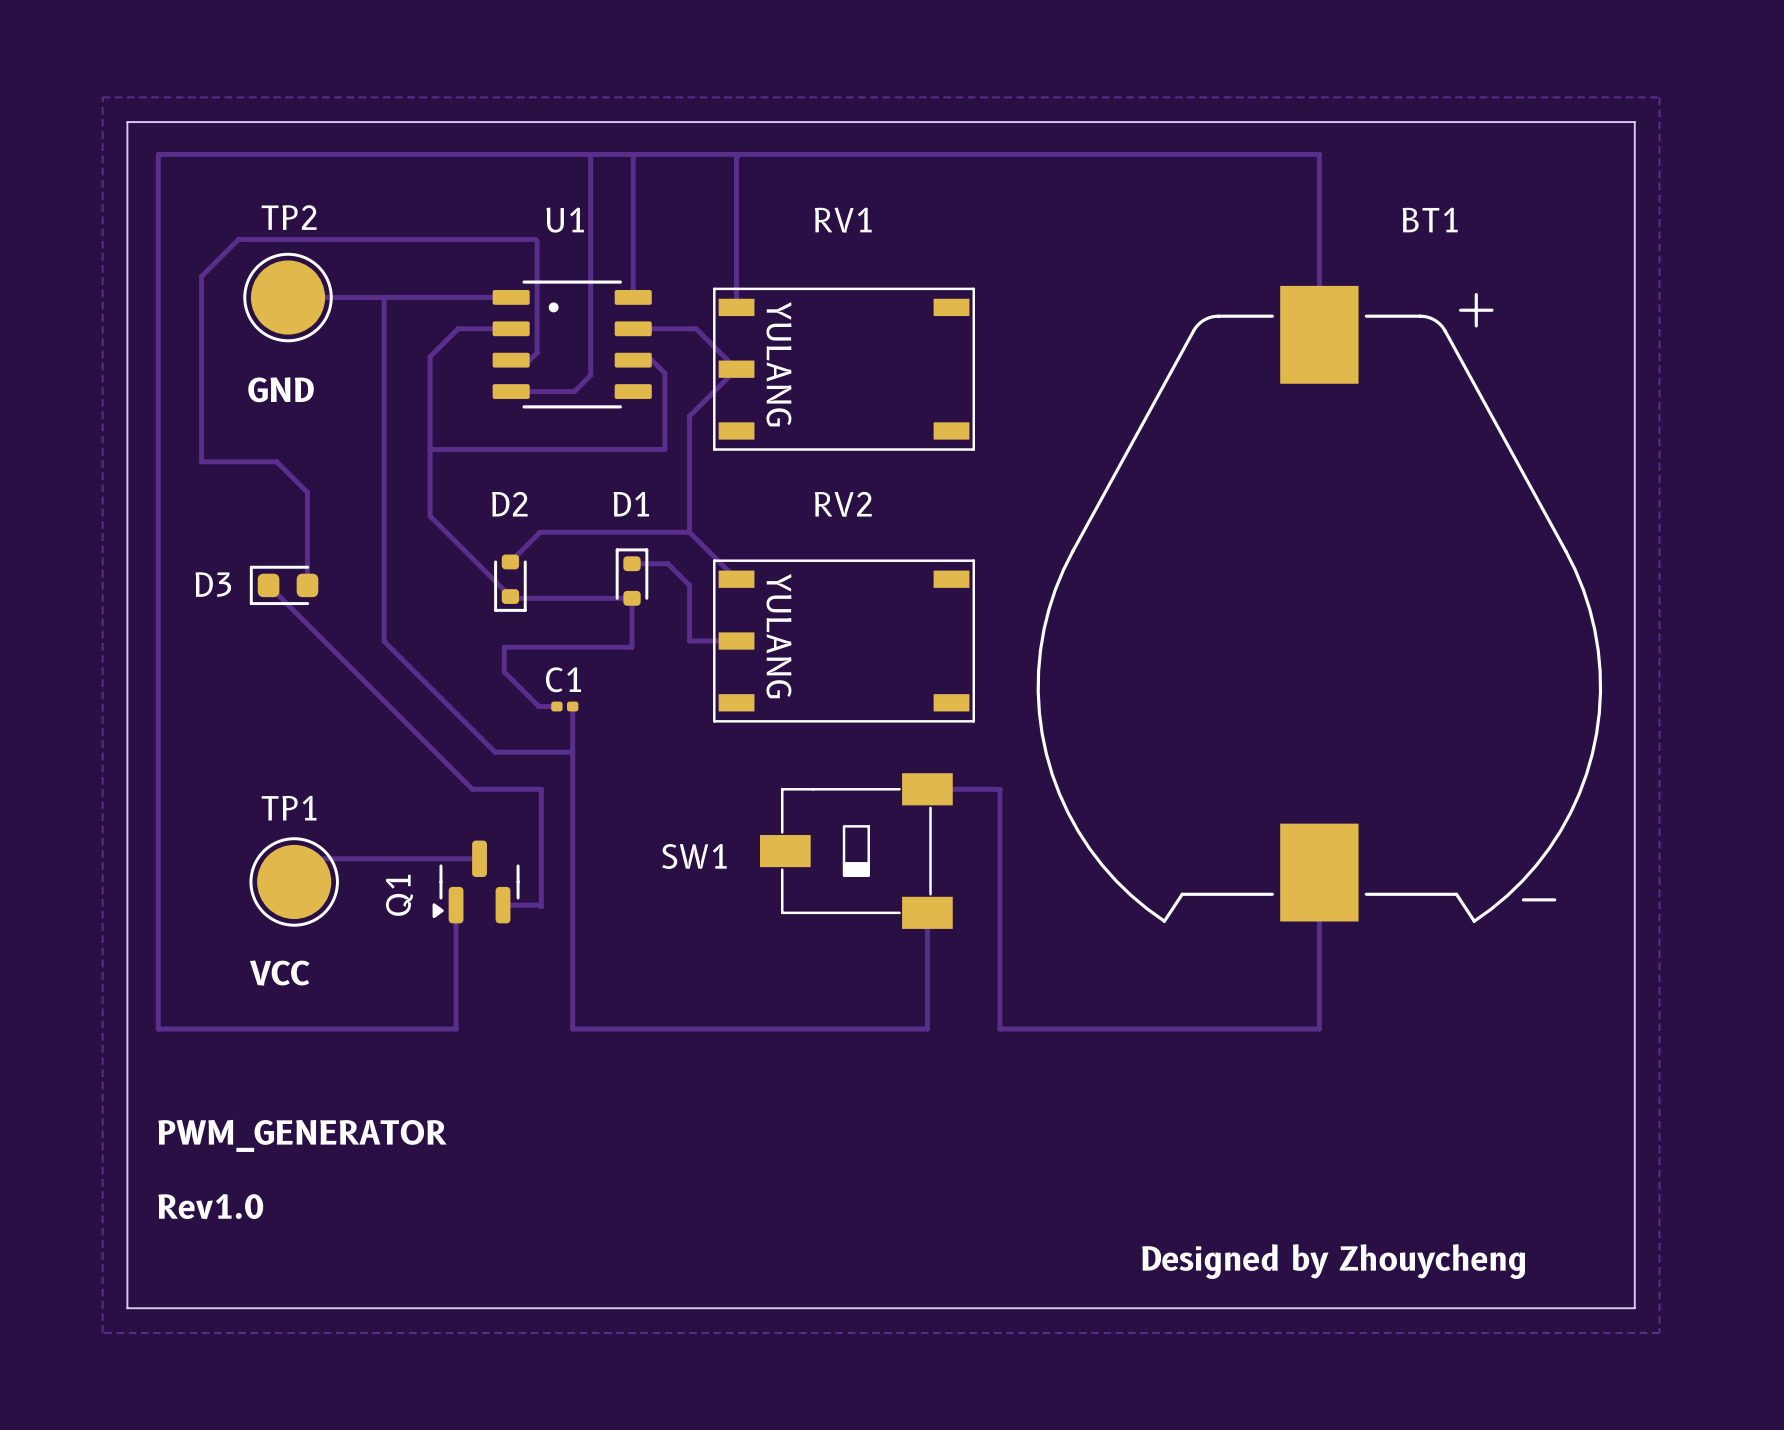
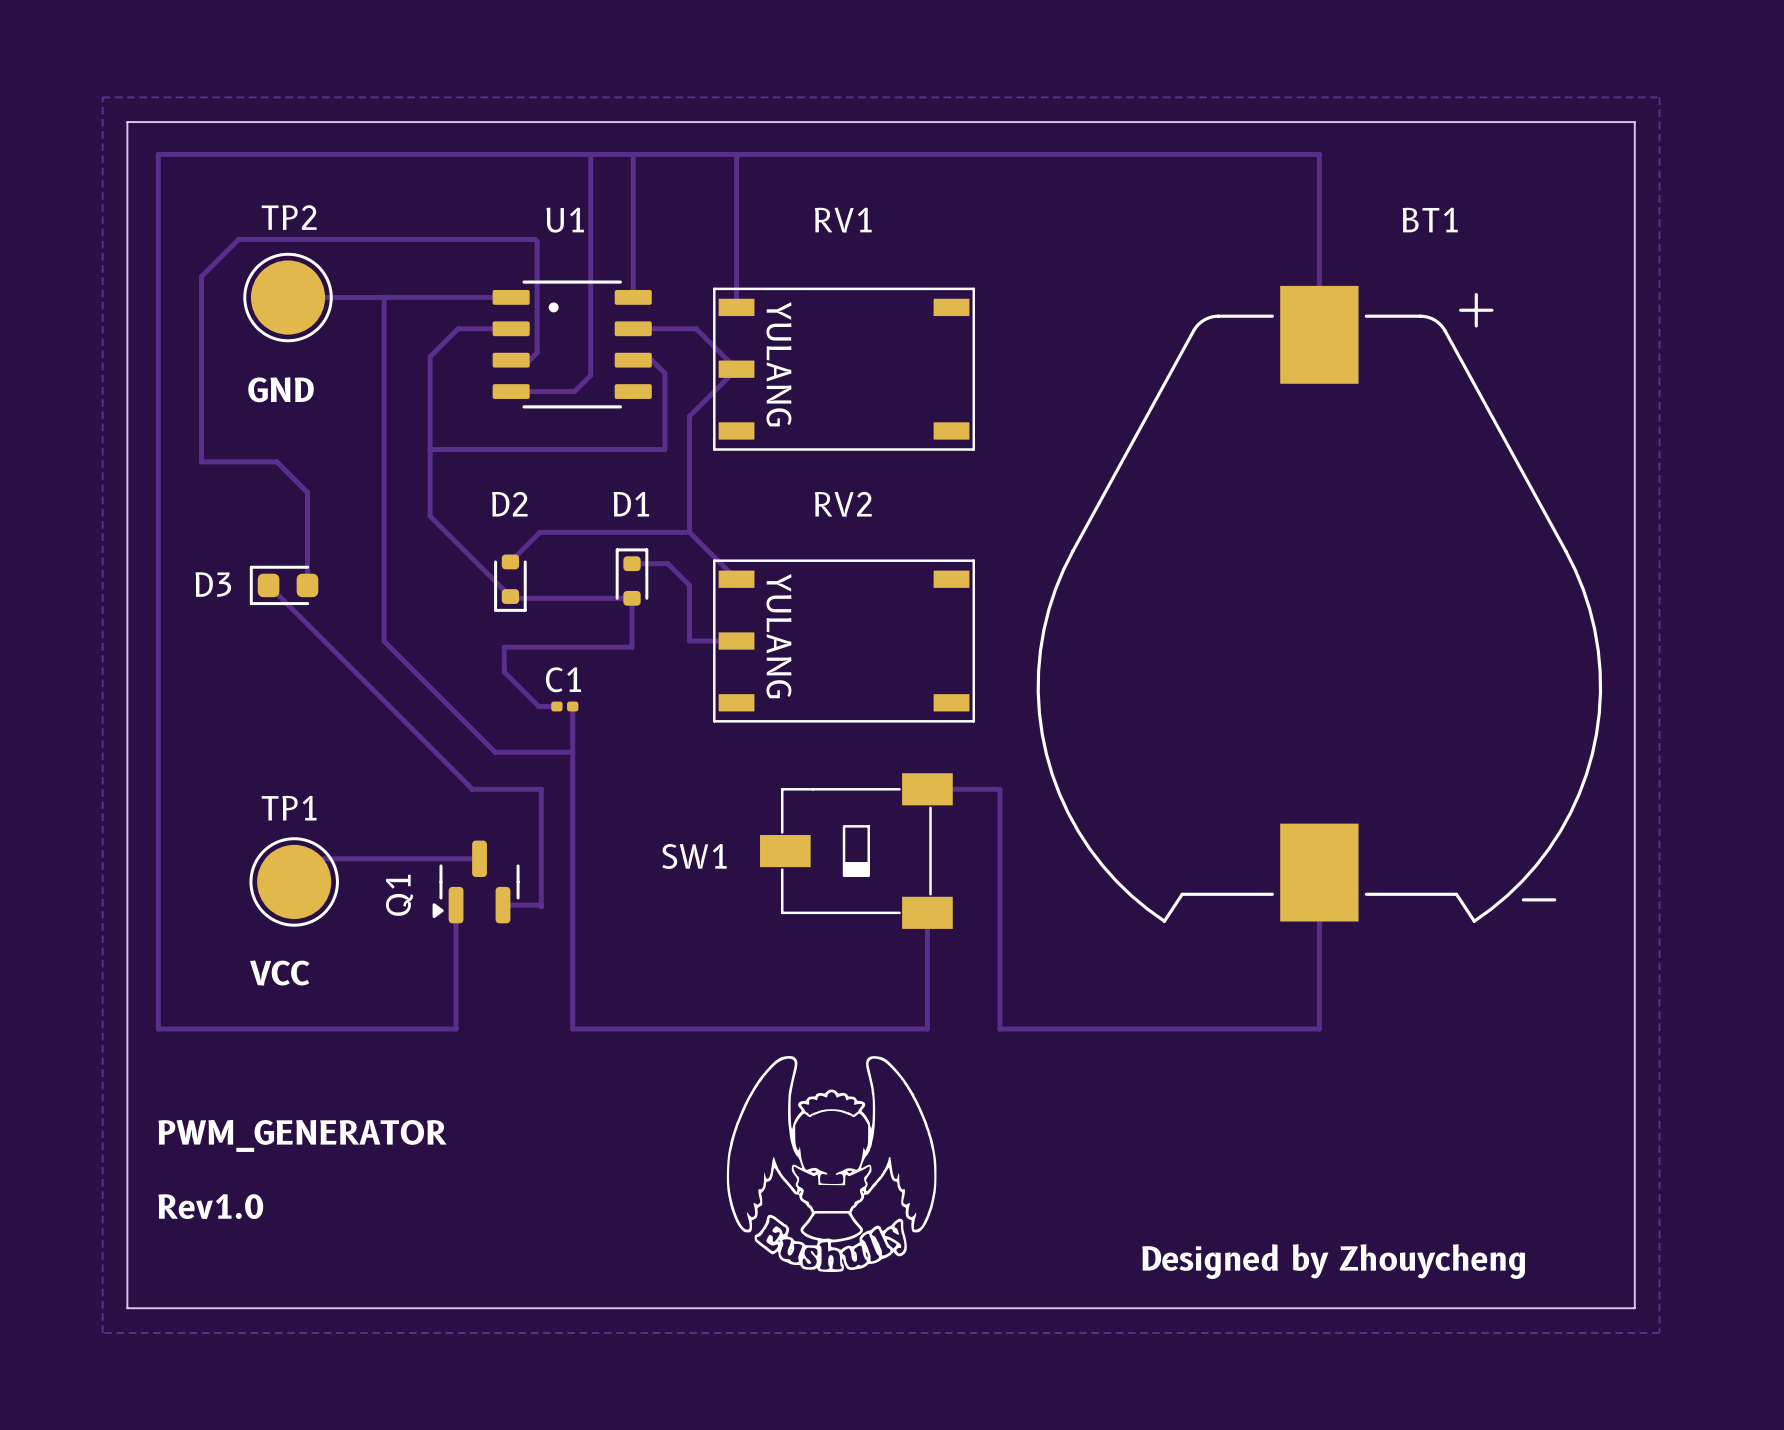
drawing: none -> [726, 1055, 937, 1273]

